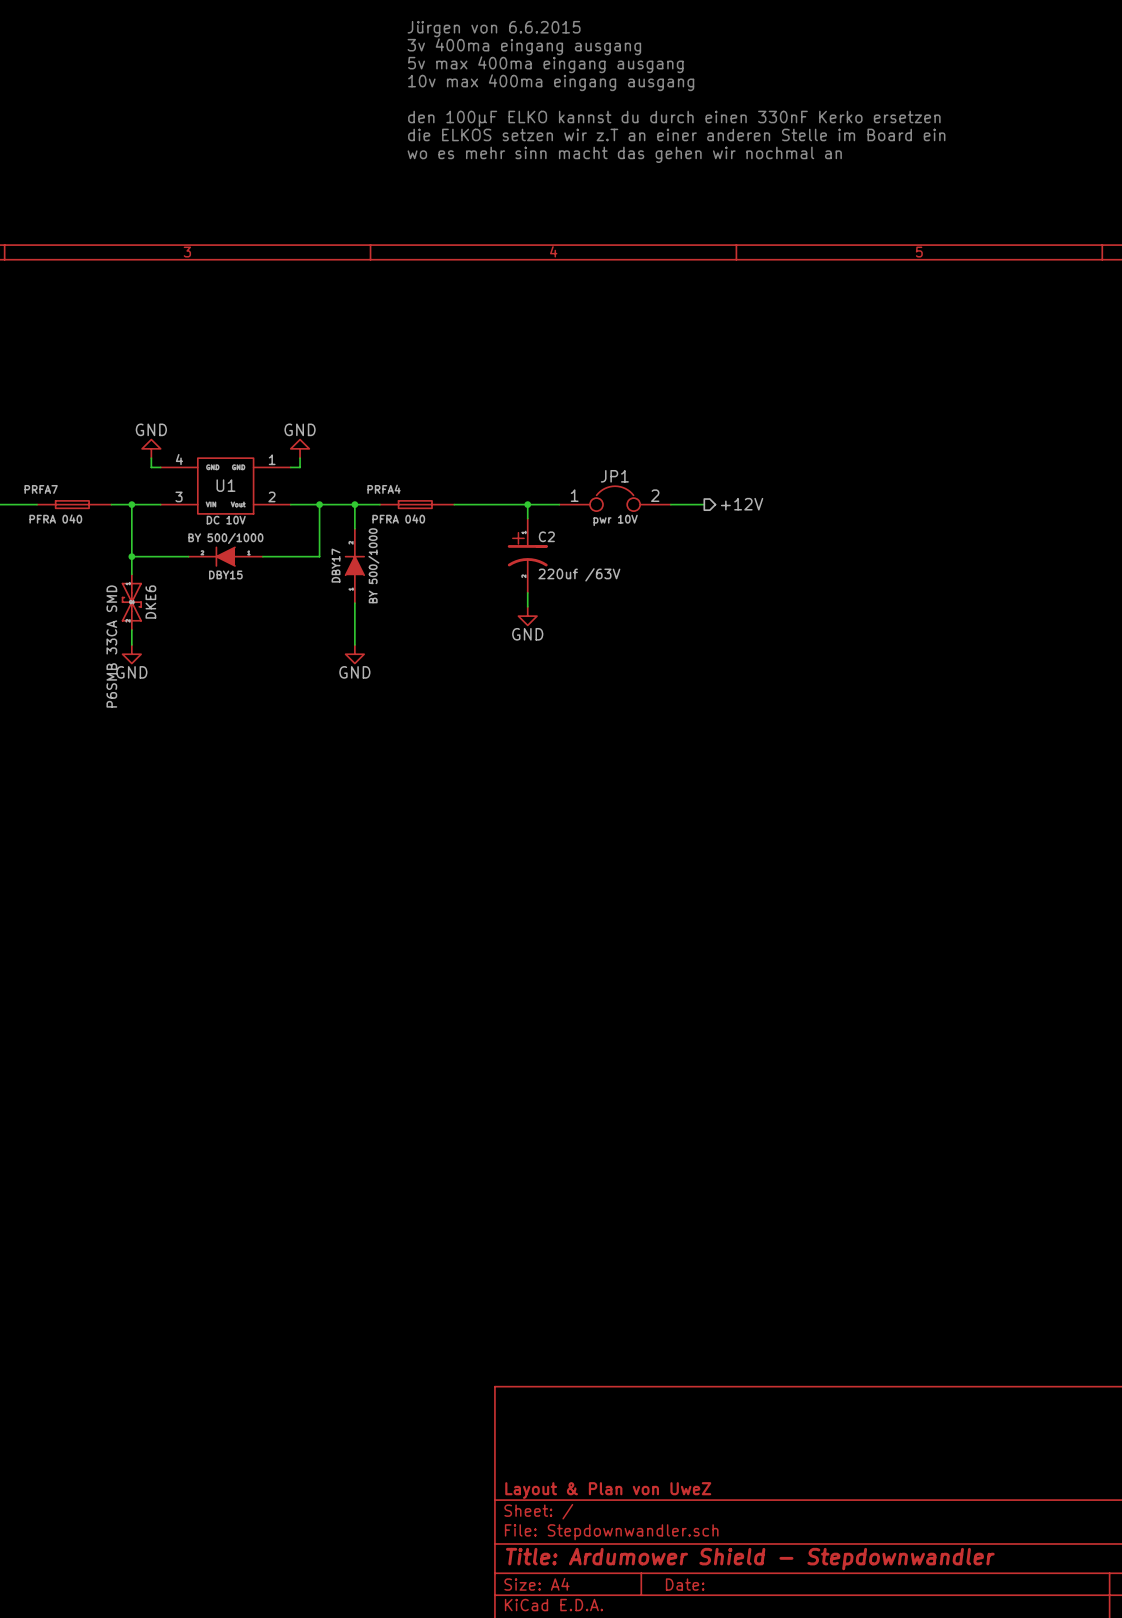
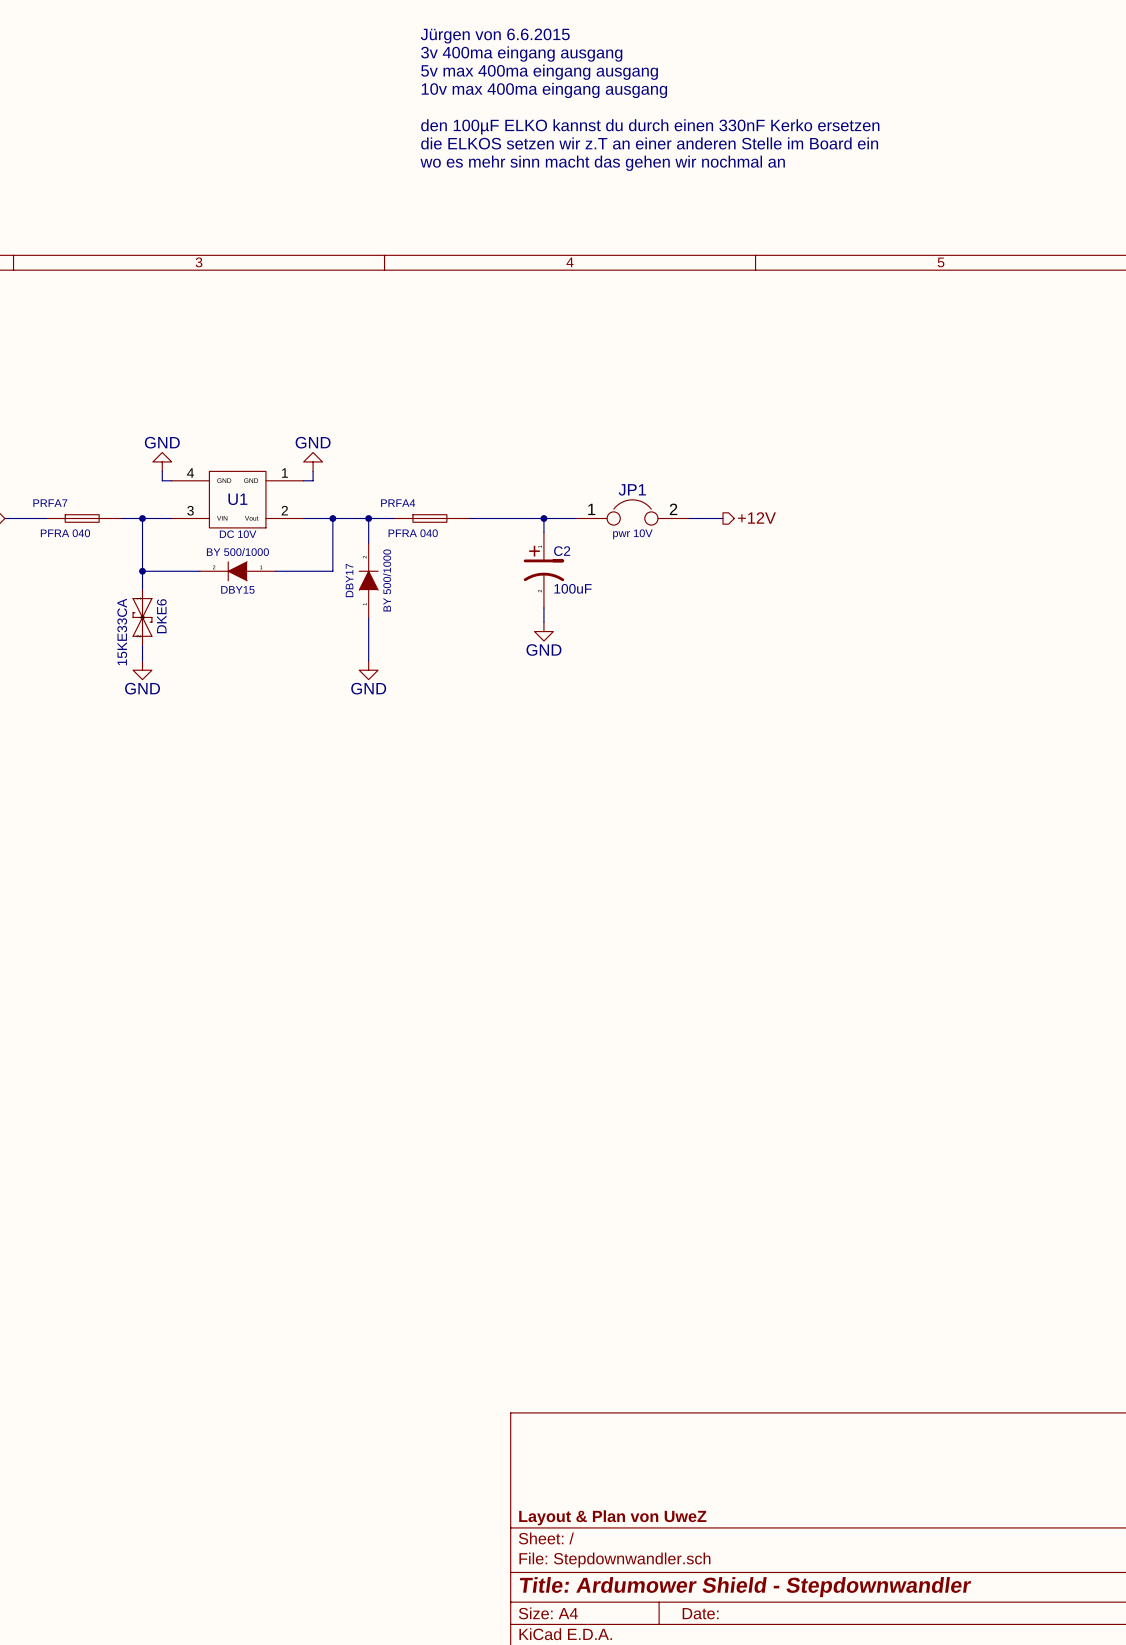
C2 value: 220uf /63V (579, 574) -> 100uF (573, 588)
DKE6 value: P6SMB 33CA SMD (111, 646) -> 15KE33CA (122, 631)

